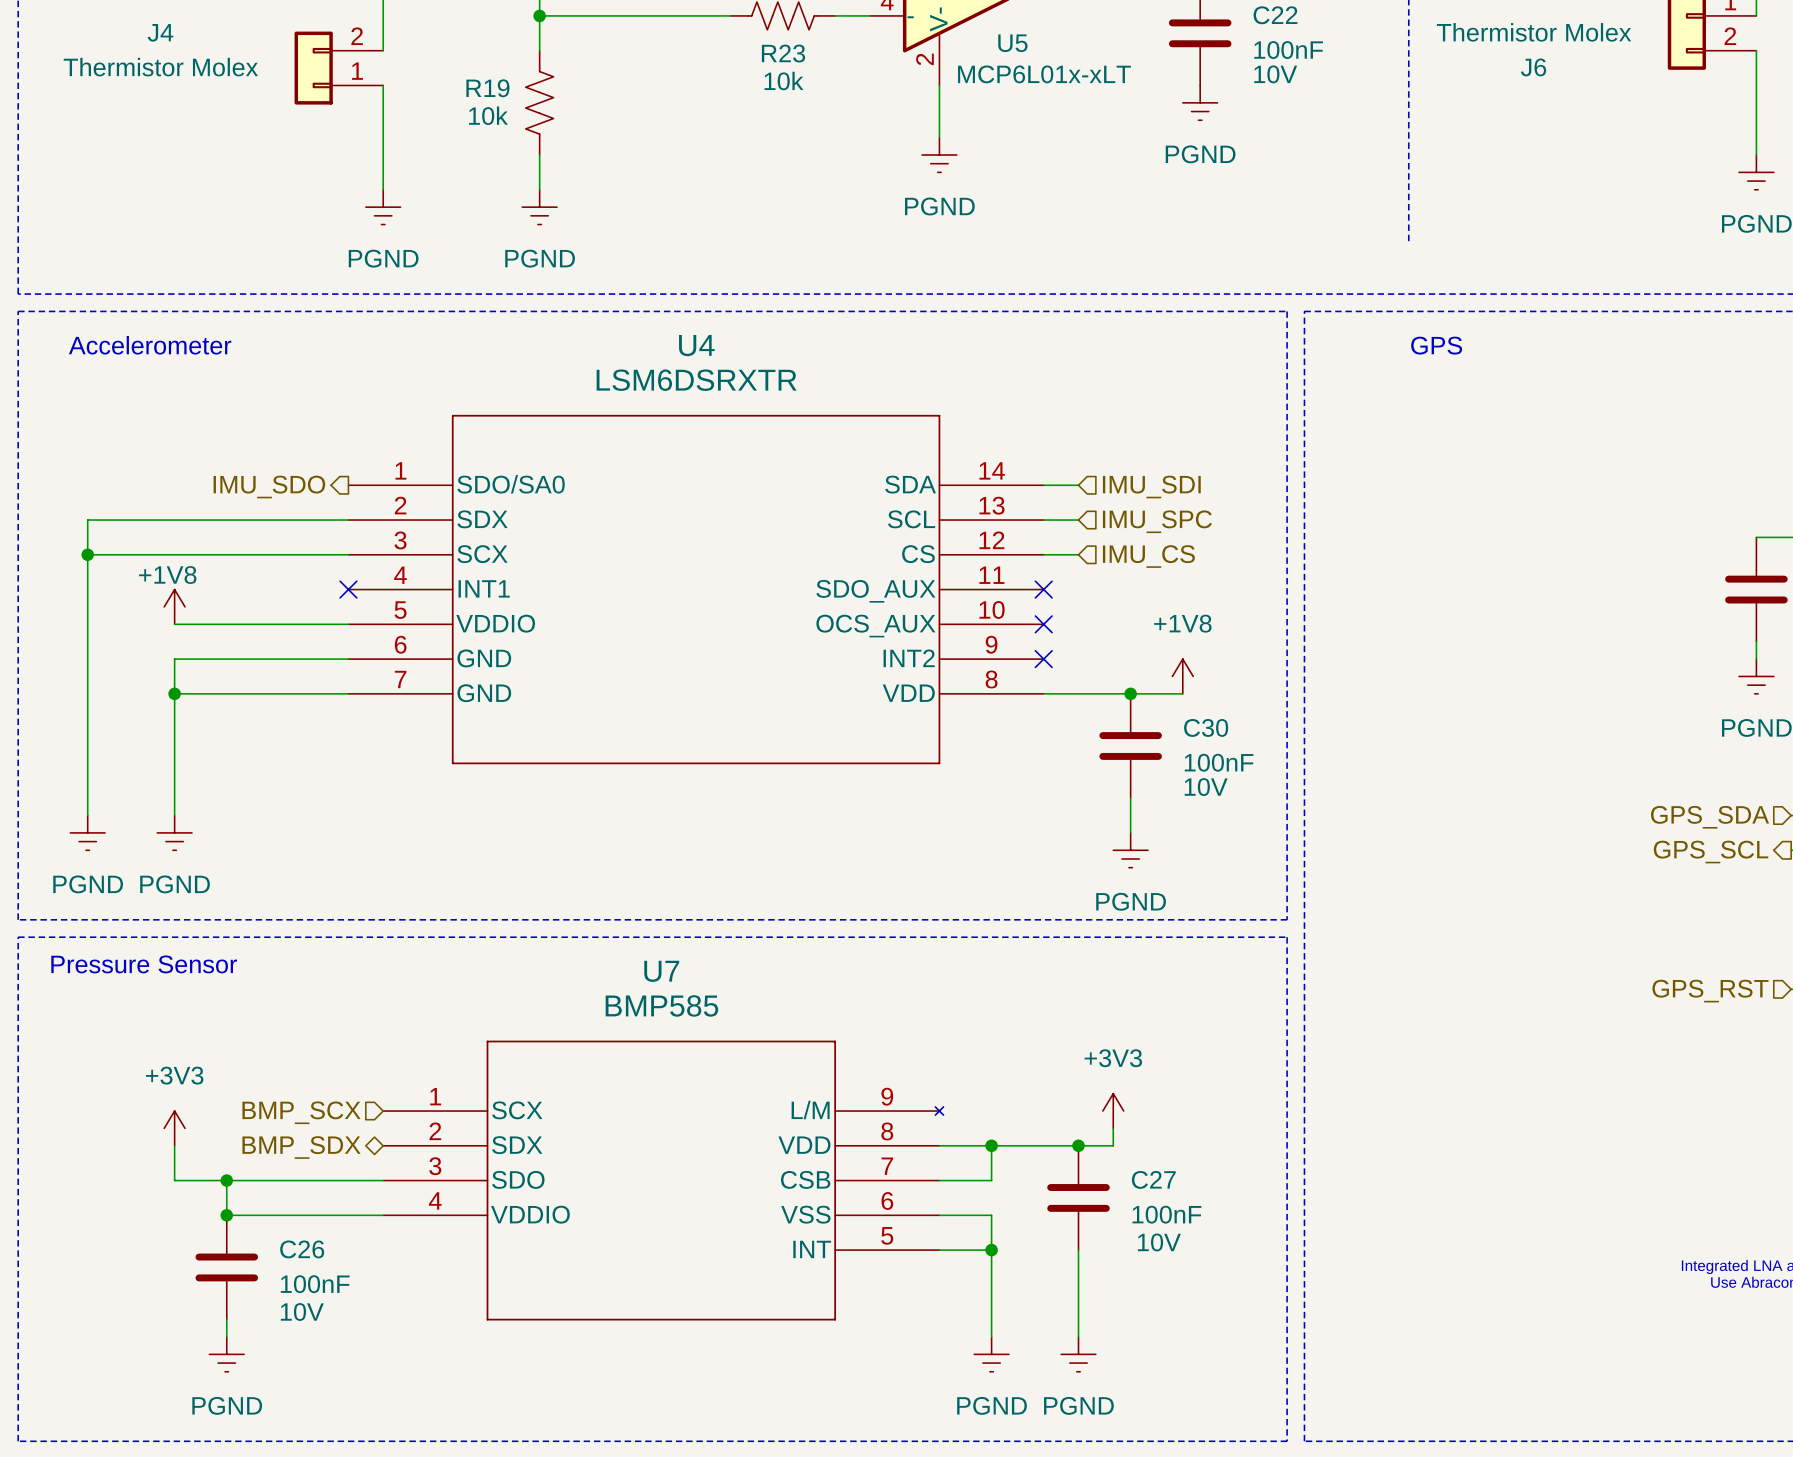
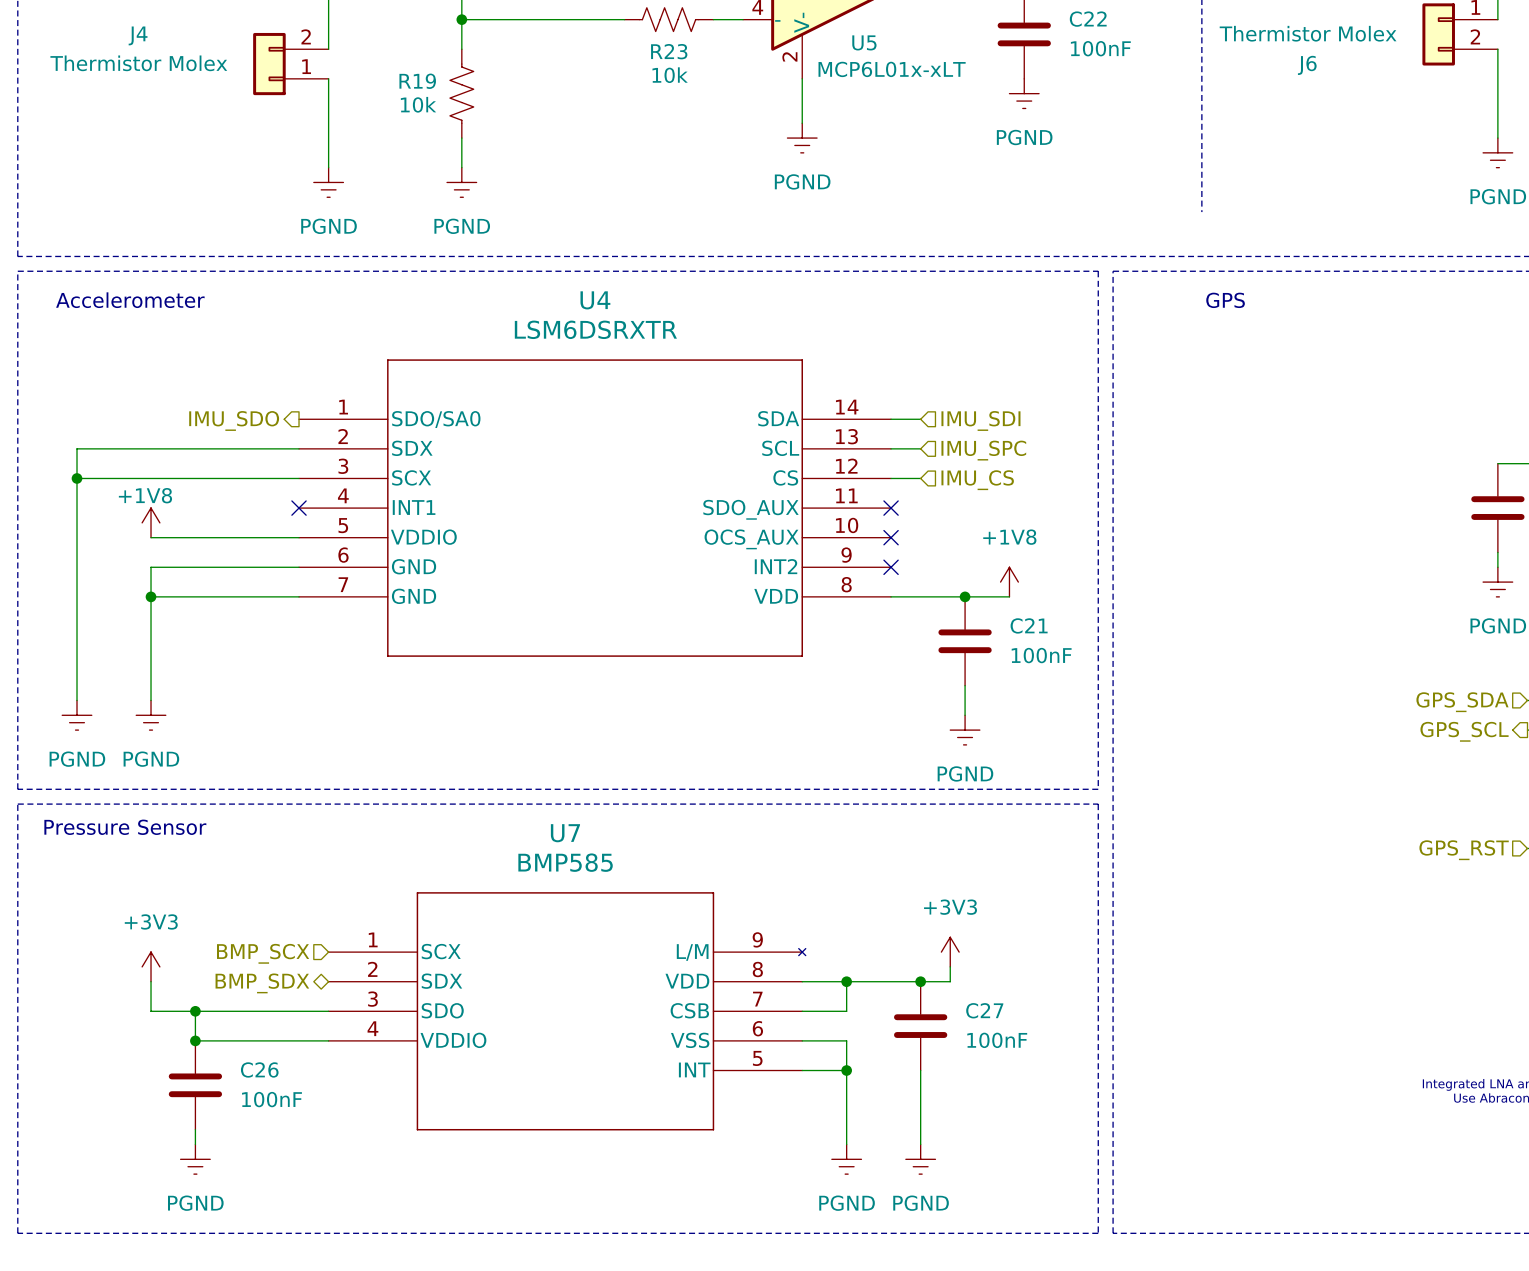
C22 text: 10V (1275, 74) -> none
C30 name: C30 (1206, 727) -> C21 (1029, 625)
C30 text: 10V (1206, 787) -> none
C27 text: 10V (1159, 1242) -> none
C26 text: 10V (302, 1312) -> none

